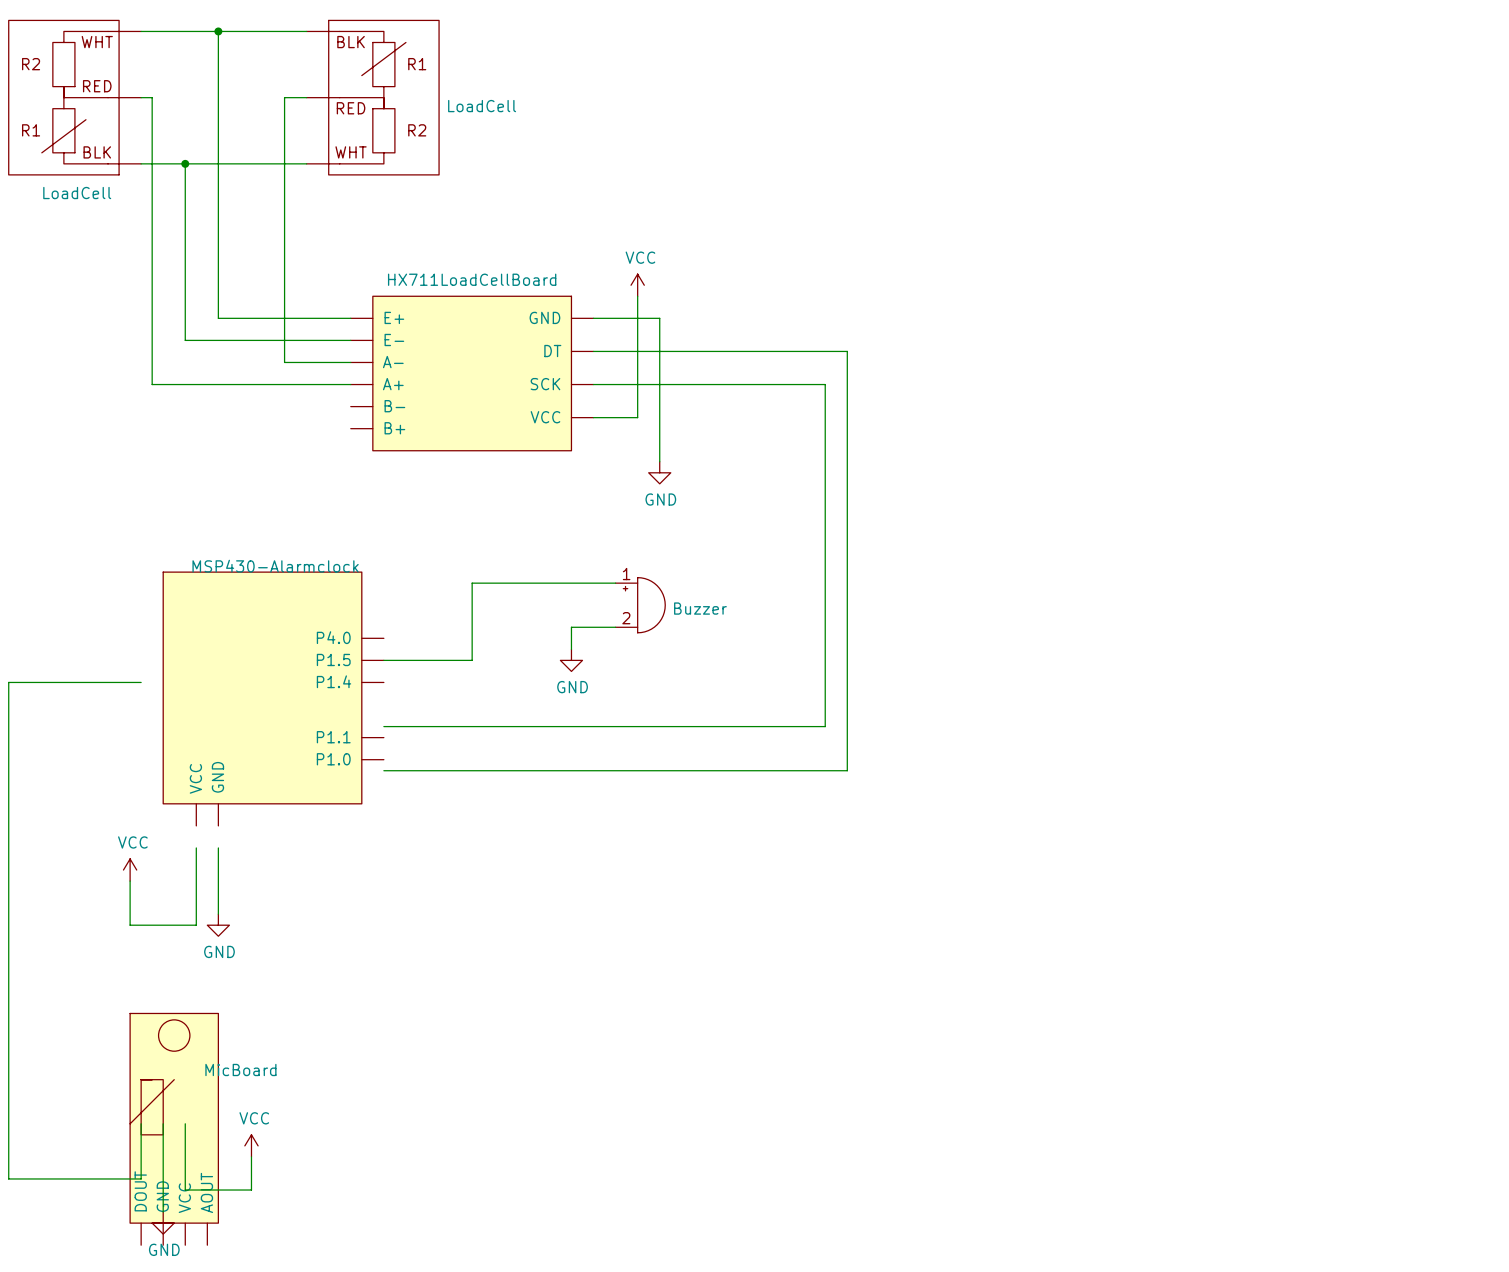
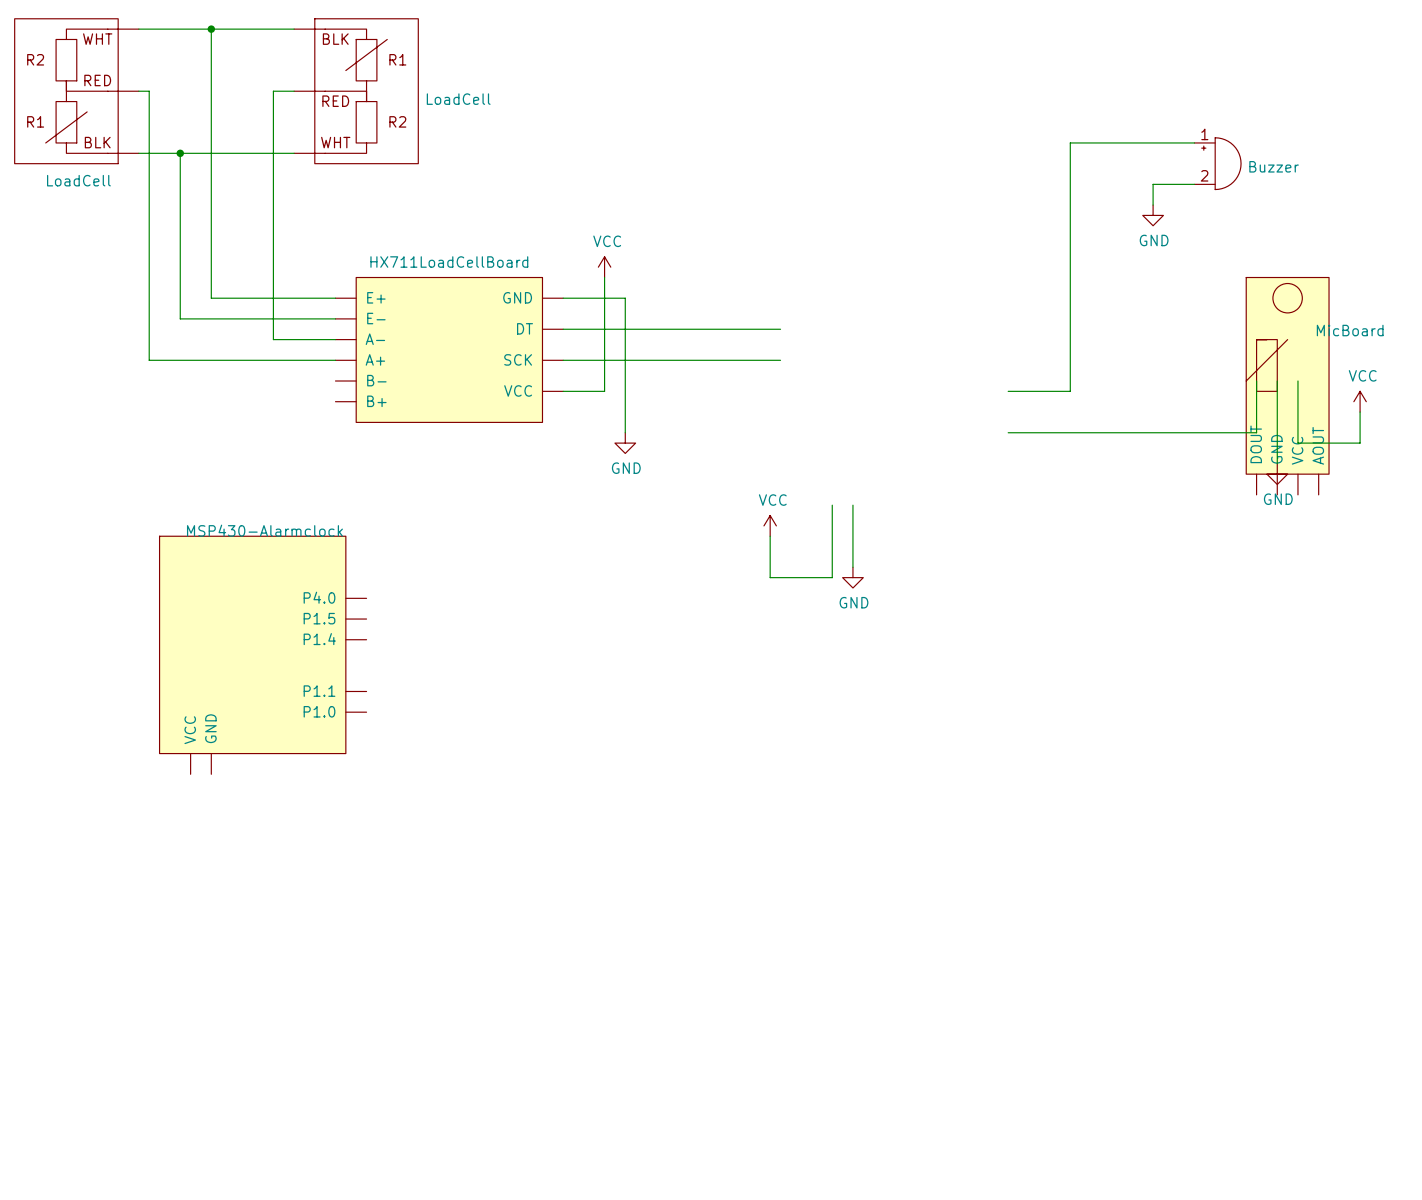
wire: none -> (1194, 142) (1070, 142) (1070, 391) (1008, 391)
part: none -> Buzzer (1217, 163)
wire: none -> (1194, 184) (1153, 184) (1153, 205)
power symbol: none -> GND (1153, 215)
wire: (825, 351) (847, 351) (847, 770) (383, 770) -> none
wire: (825, 384) (825, 726) (383, 726) -> none
wire: none -> (1256, 381) (1256, 432) (1008, 432)
wire: none -> (1277, 381) (1277, 463)
wire: none -> (1297, 381) (1297, 443) (1360, 443) (1360, 412)
part: none -> MicBoard (1287, 386)
power symbol: none -> VCC (1360, 401)
power symbol: none -> GND (1277, 474)
wire: none -> (832, 505) (832, 577) (770, 577) (770, 536)
wire: none -> (852, 505) (852, 567)
power symbol: none -> VCC (770, 525)
wire: (615, 583) (472, 583) (472, 660) (383, 660) -> none
part: Buzzer (640, 605) -> none
power symbol: none -> GND (852, 577)
wire: (615, 627) (571, 627) (571, 649) -> none
power symbol: GND (571, 660) -> none
wire: (141, 682) (8, 682) (8, 1178) (141, 1178) (141, 1123) -> none
wire: (196, 847) (196, 925) (130, 925) (130, 881) -> none
wire: (218, 847) (218, 914) -> none
power symbol: VCC (130, 870) -> none
power symbol: GND (218, 925) -> none
wire: (163, 1123) (163, 1212) -> none
wire: (185, 1123) (185, 1190) (251, 1190) (251, 1156) -> none
part: MicBoard (174, 1129) -> none
power symbol: VCC (251, 1145) -> none
power symbol: GND (163, 1223) -> none

